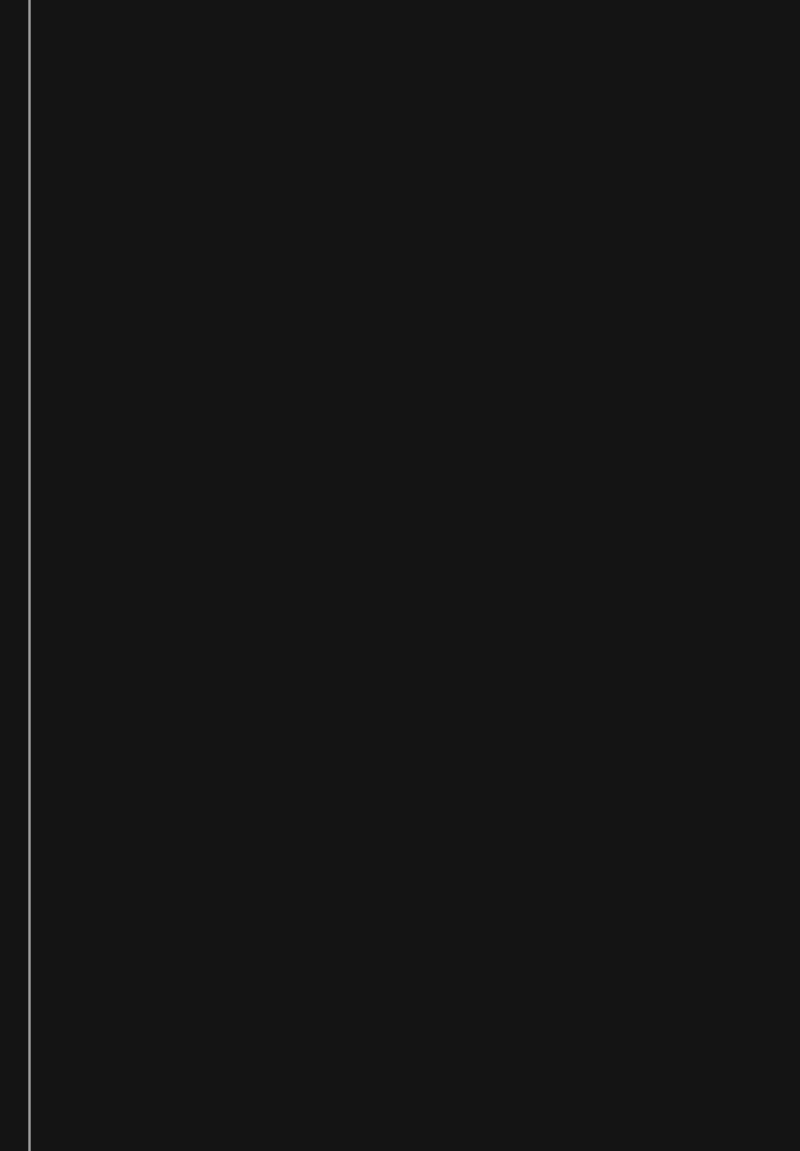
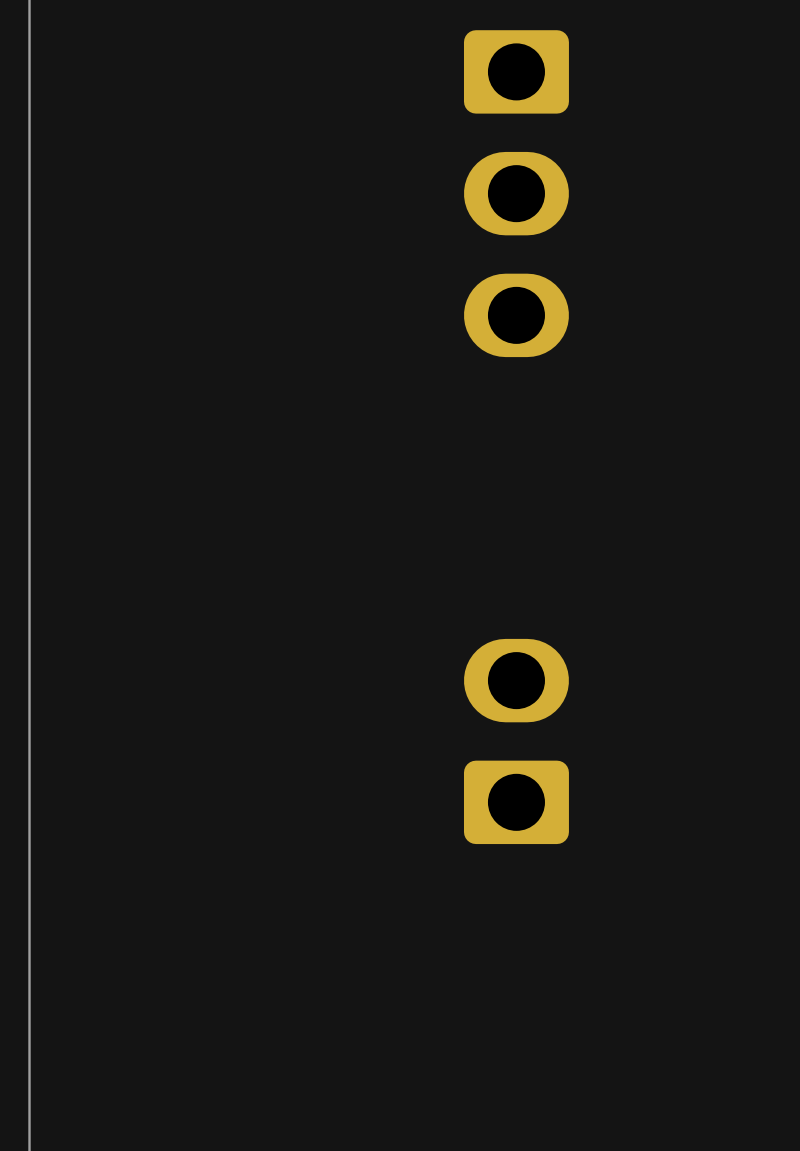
part: none -> (516, 193)
part: none -> (516, 741)

